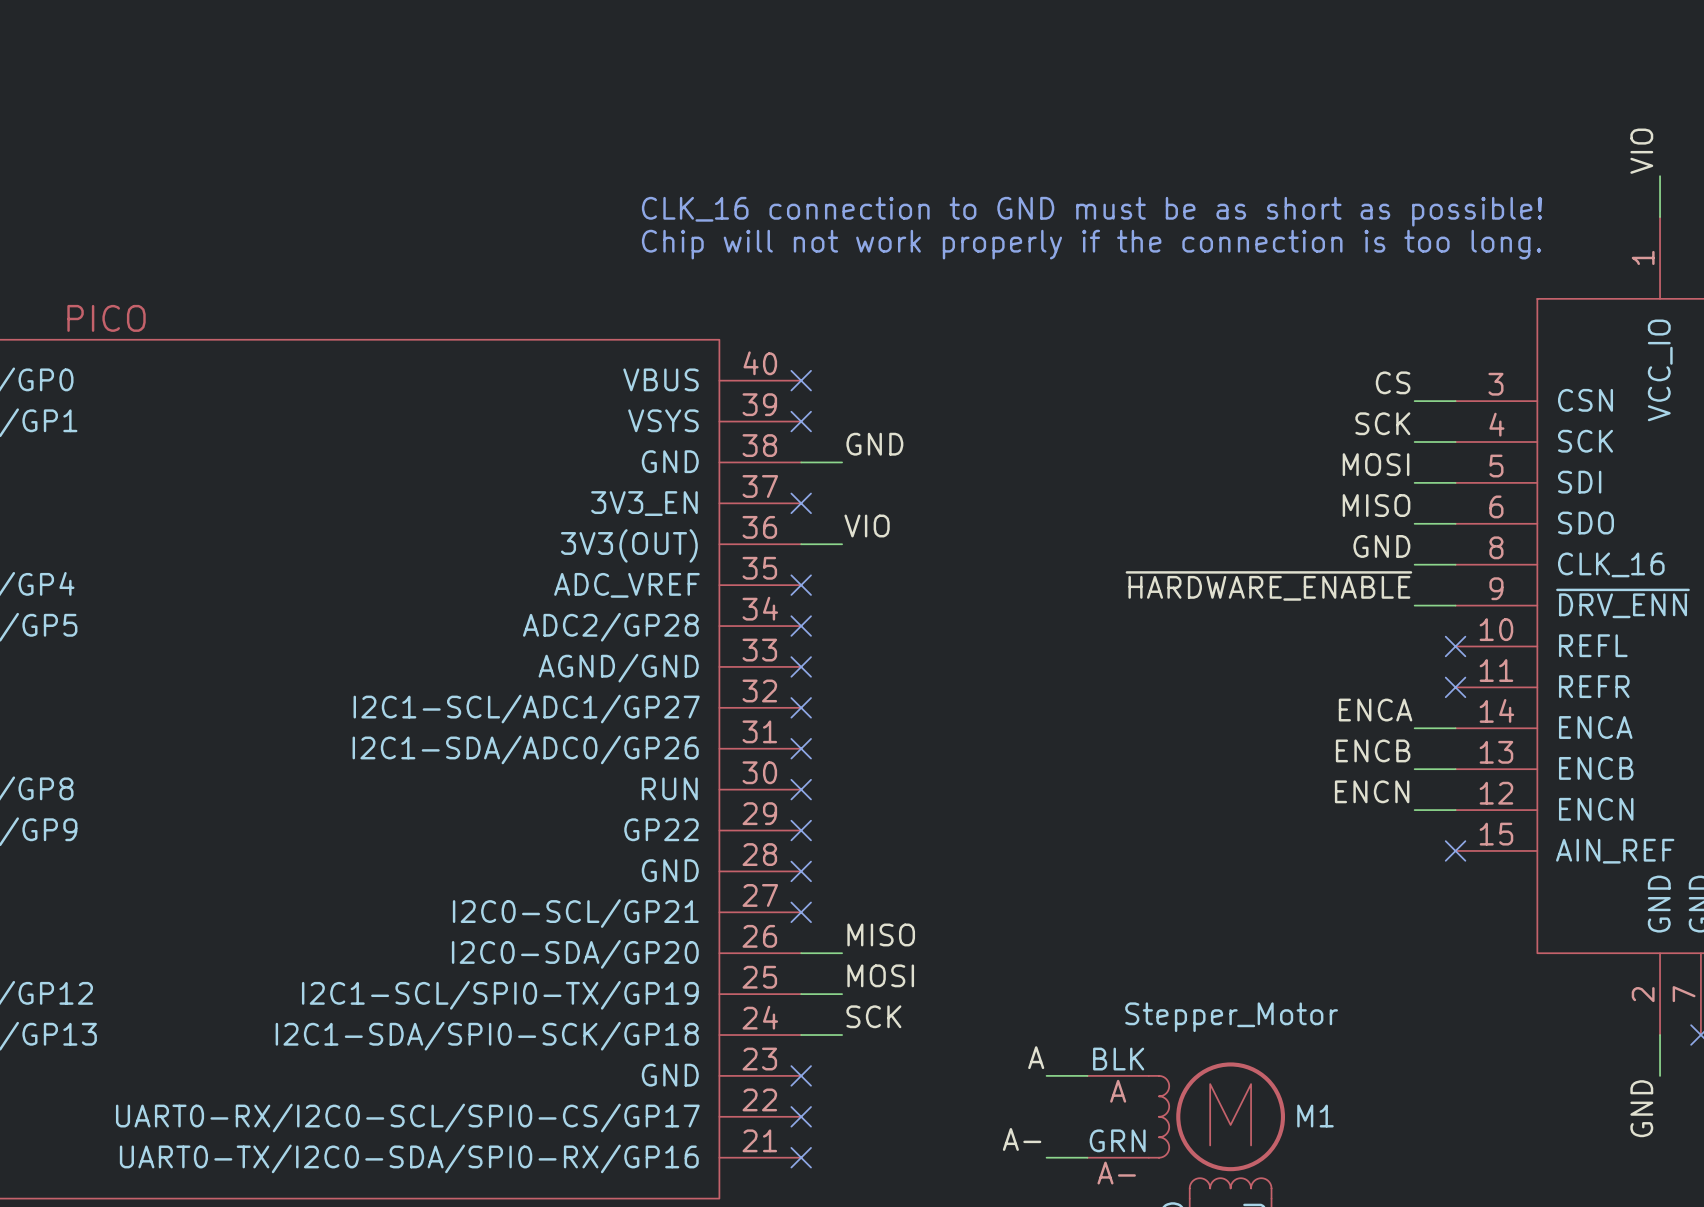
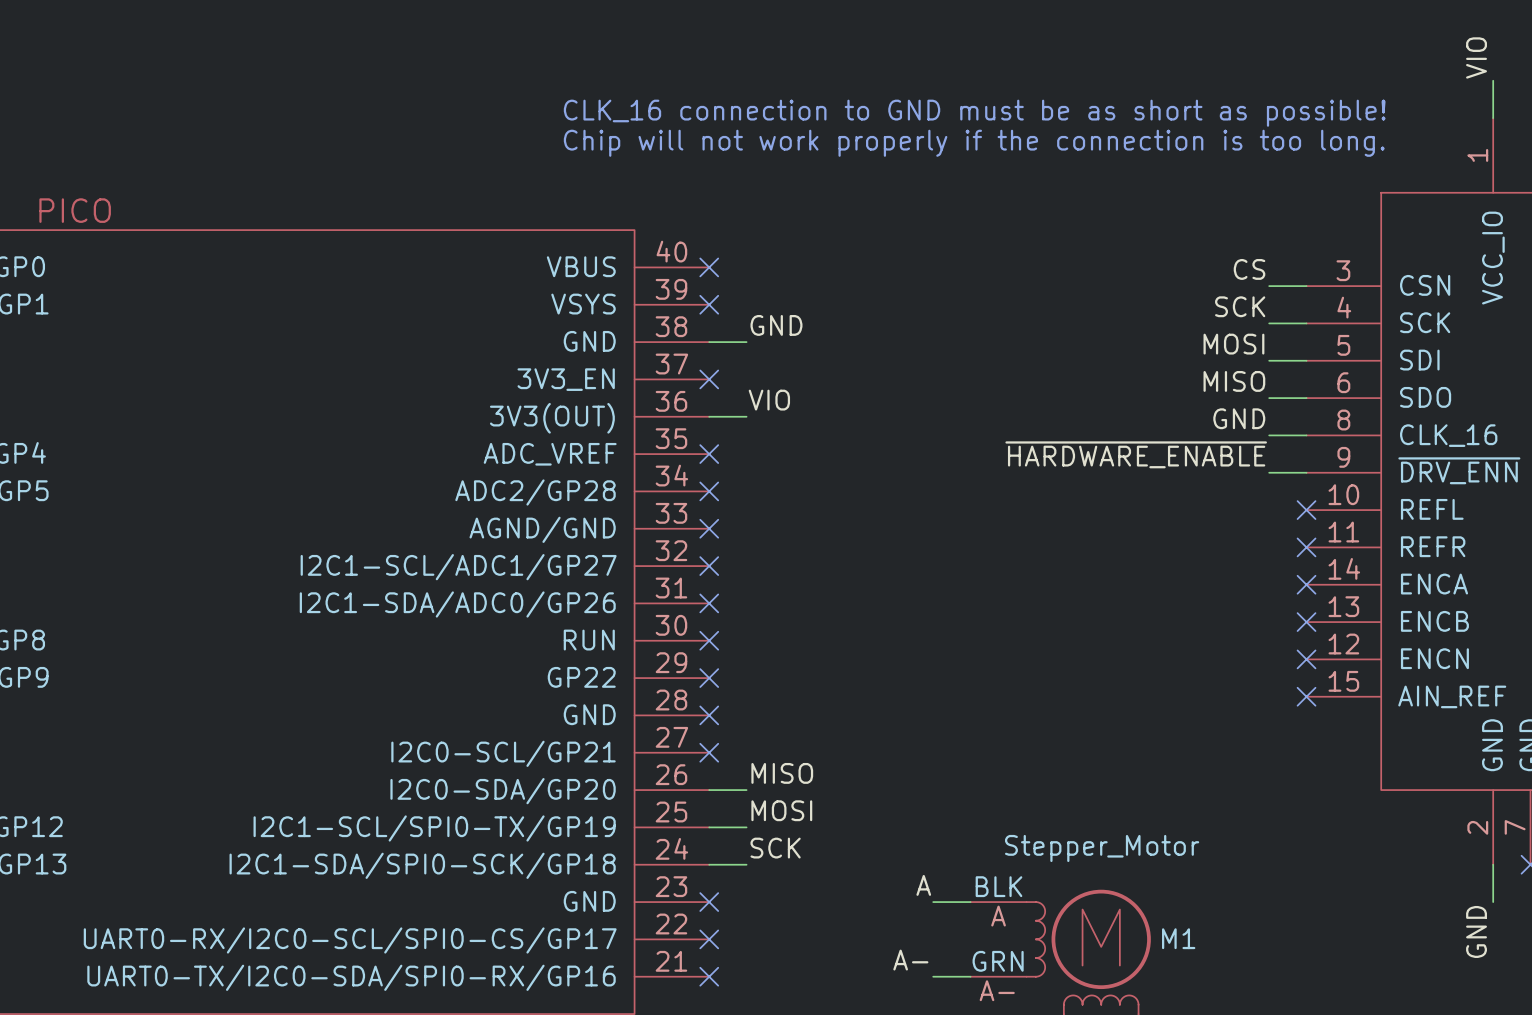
label: ENCA (1375, 710) -> none
wire: (1414, 728) (1455, 728) -> none
no-connect mark: none -> (1306, 584)
label: ENCB (1373, 750) -> none
wire: (1414, 769) (1455, 769) -> none
no-connect mark: none -> (1306, 622)
label: ENCN (1372, 791) -> none
wire: (1414, 810) (1455, 810) -> none
no-connect mark: none -> (1306, 659)

